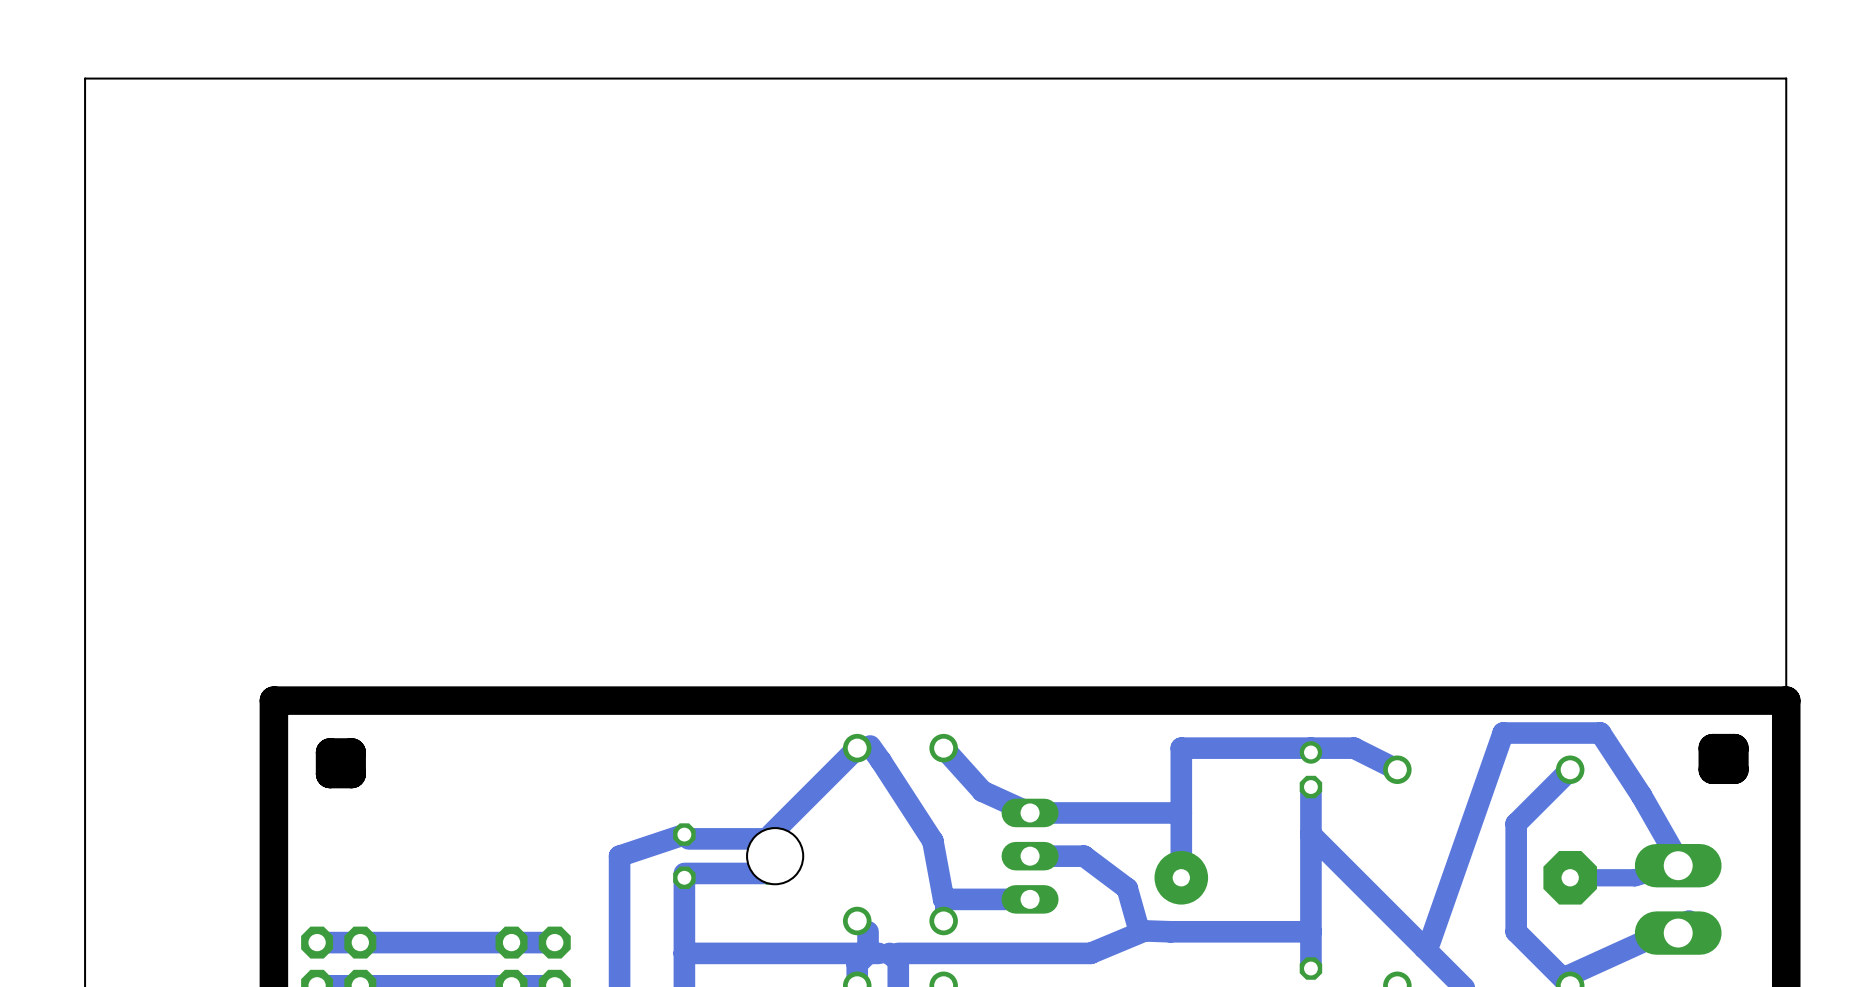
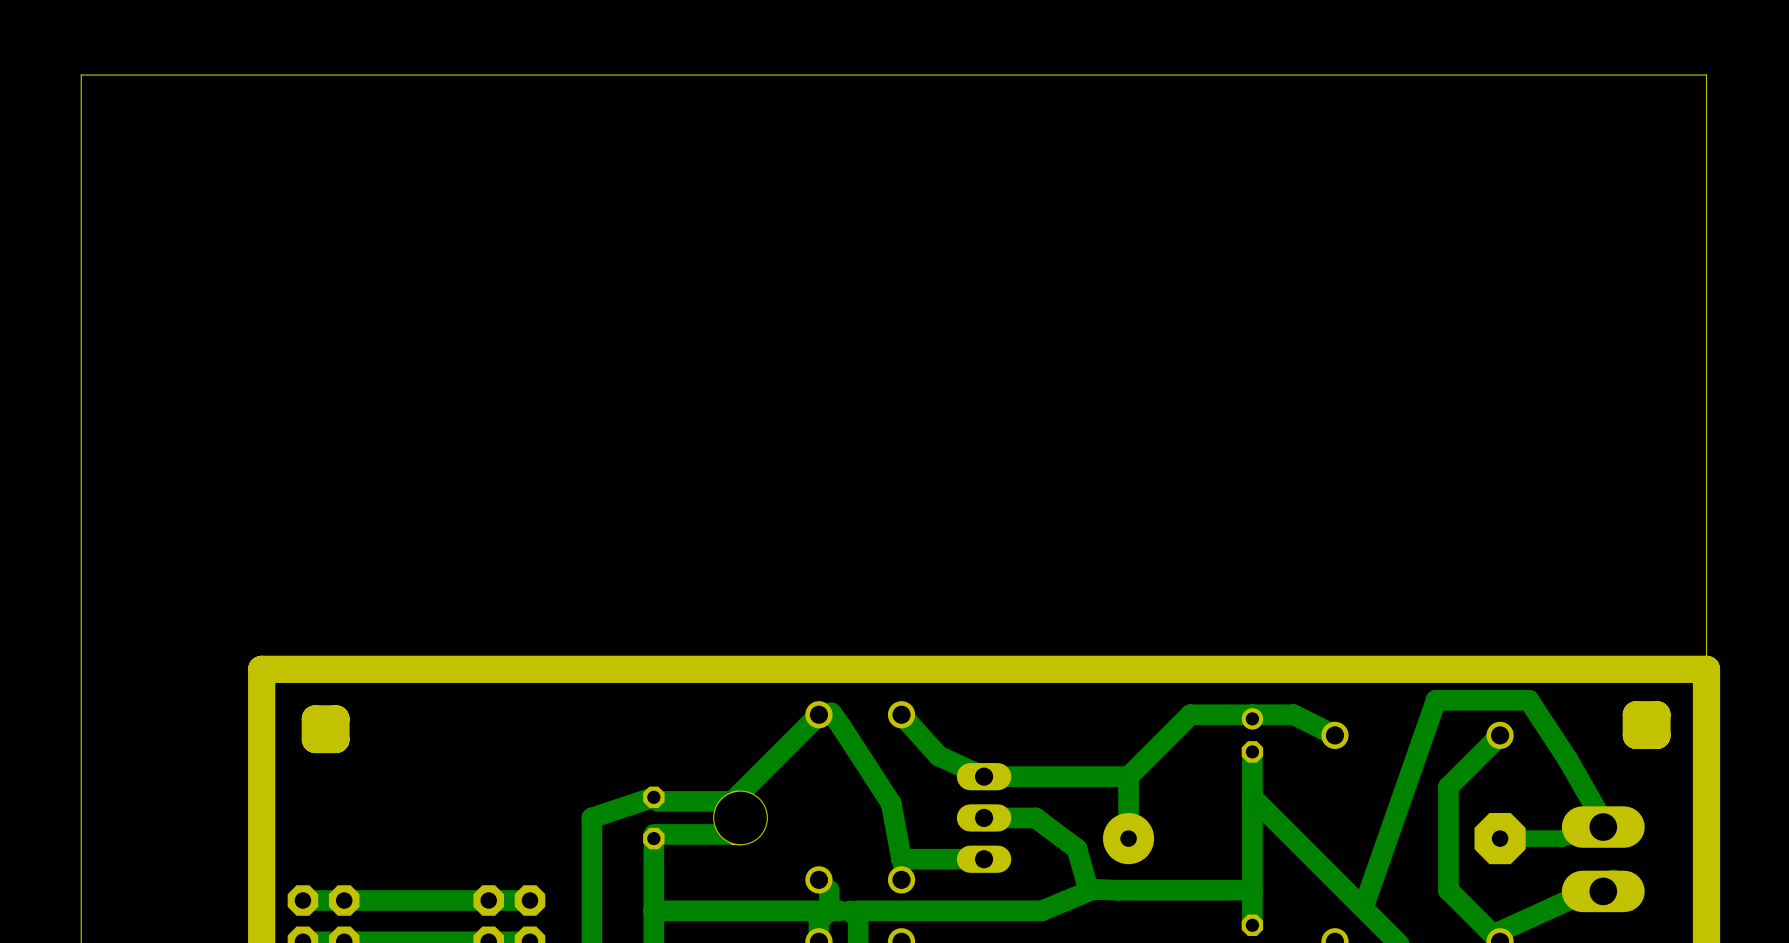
track: (1246, 748) (1181, 748) (1181, 812) -> (1190, 714) (1128, 776)

